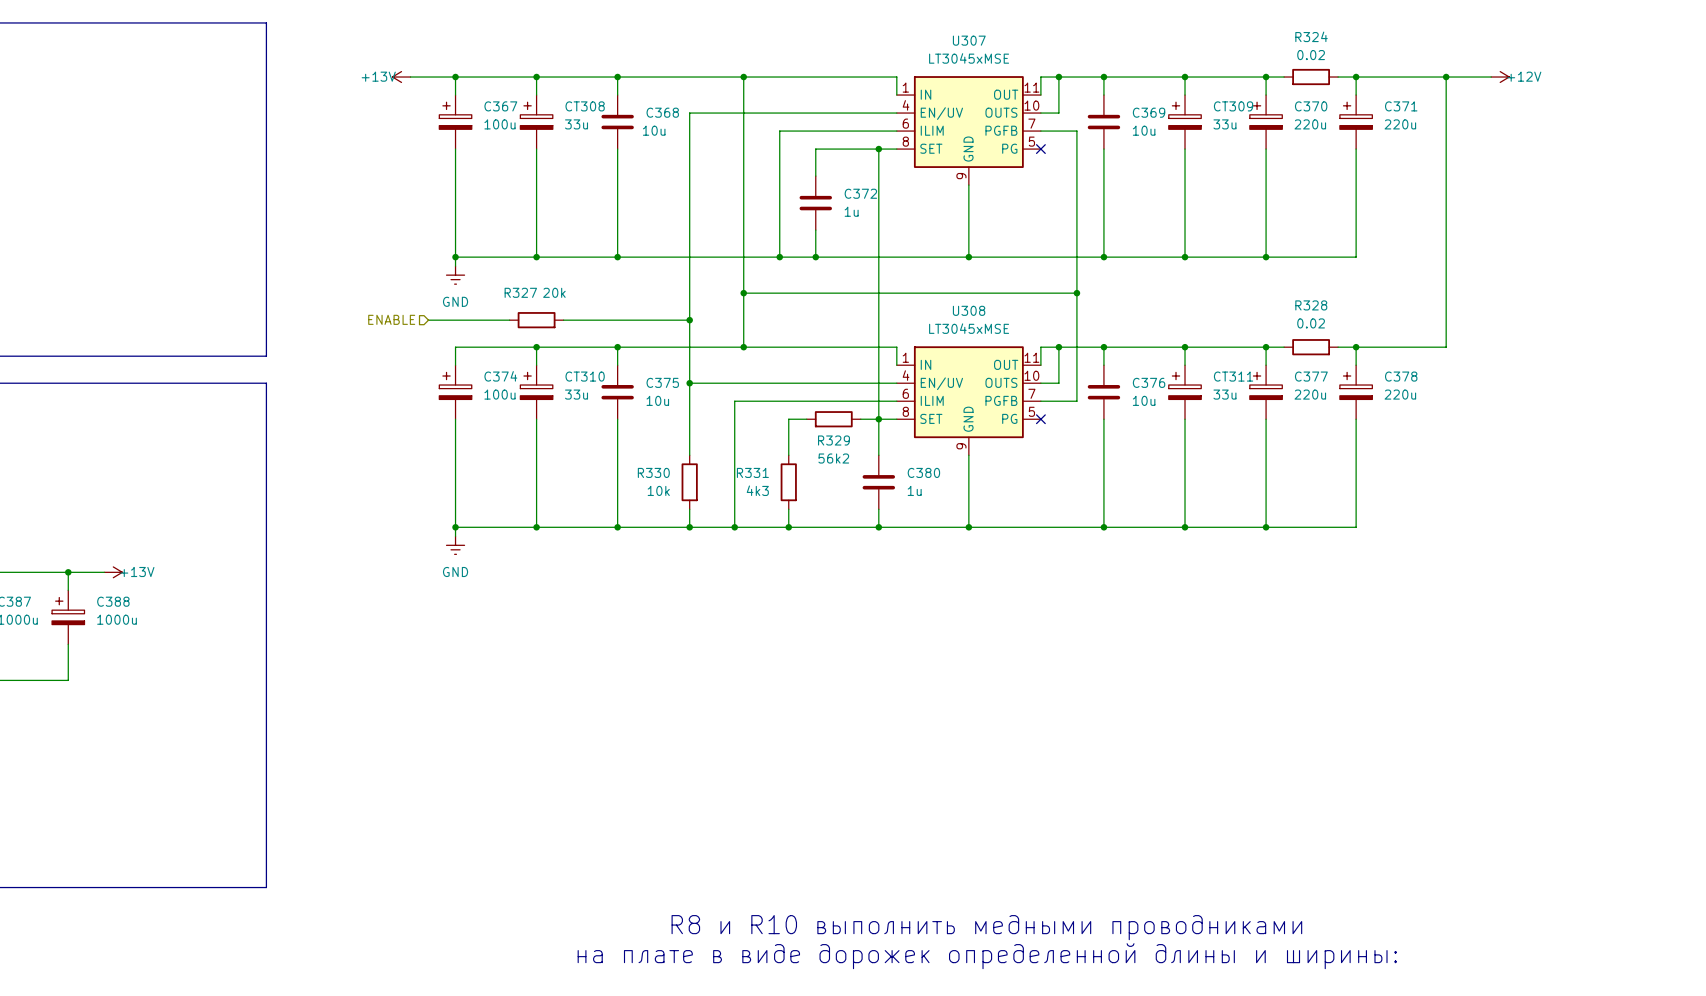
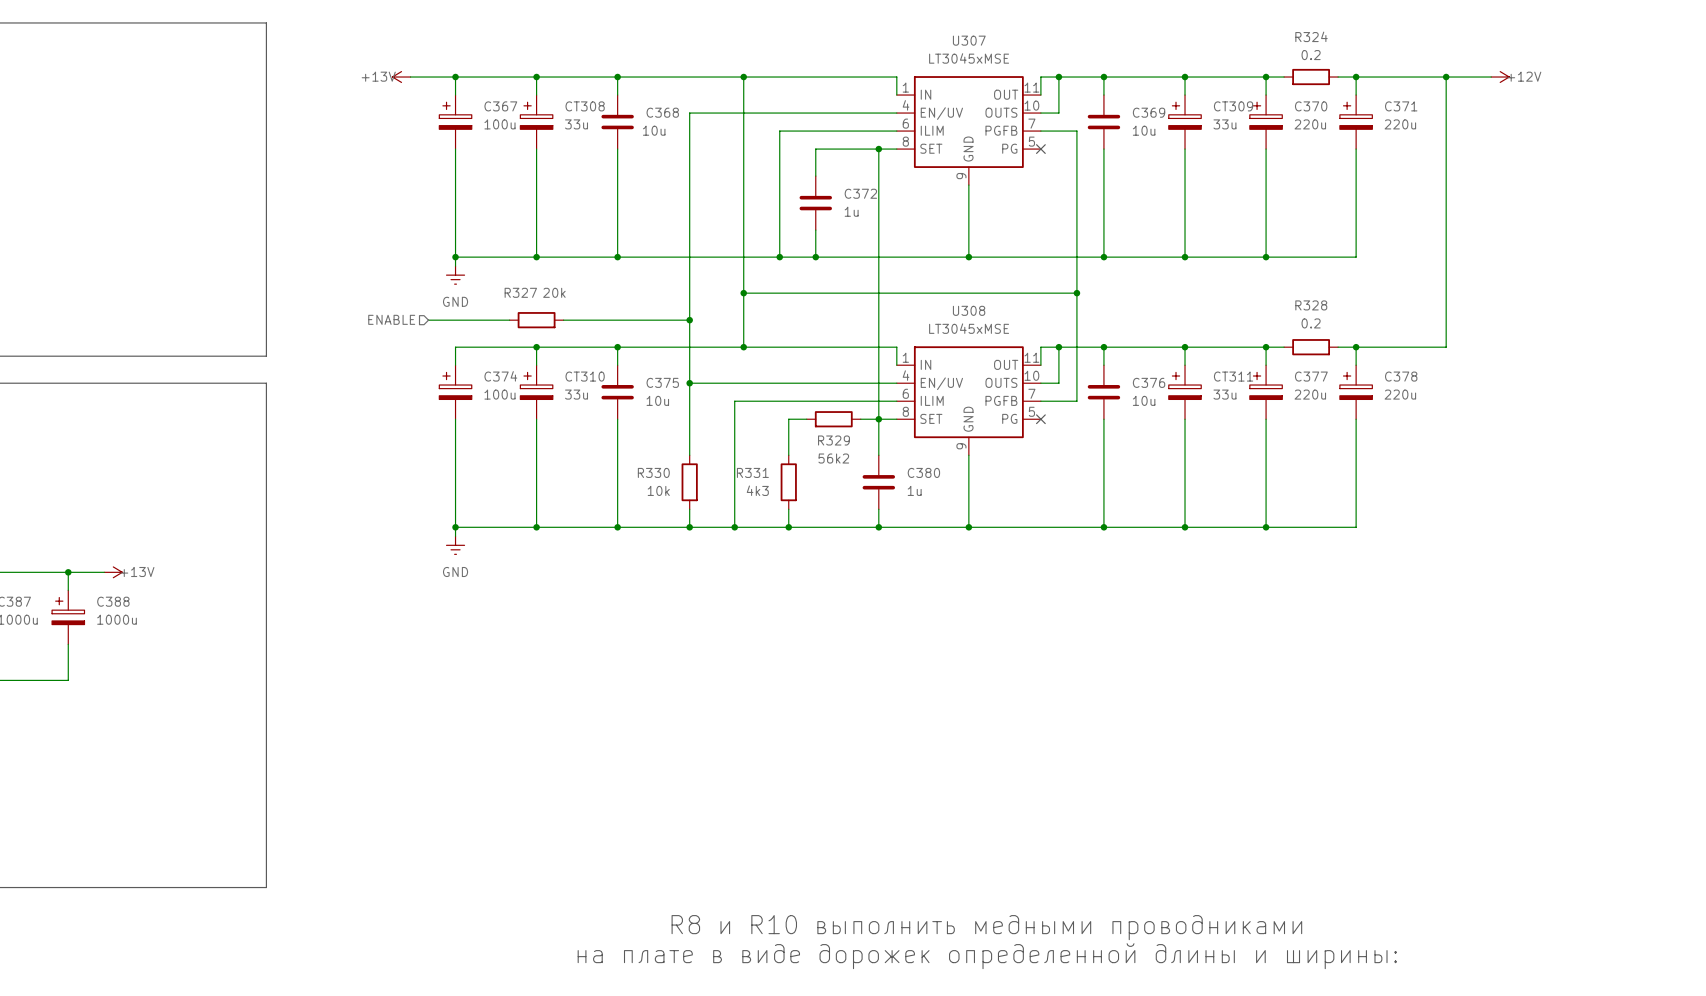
R324 value: 0.02 (1311, 55) -> 0.2 (1311, 55)
R328 value: 0.02 (1311, 323) -> 0.2 (1311, 323)

